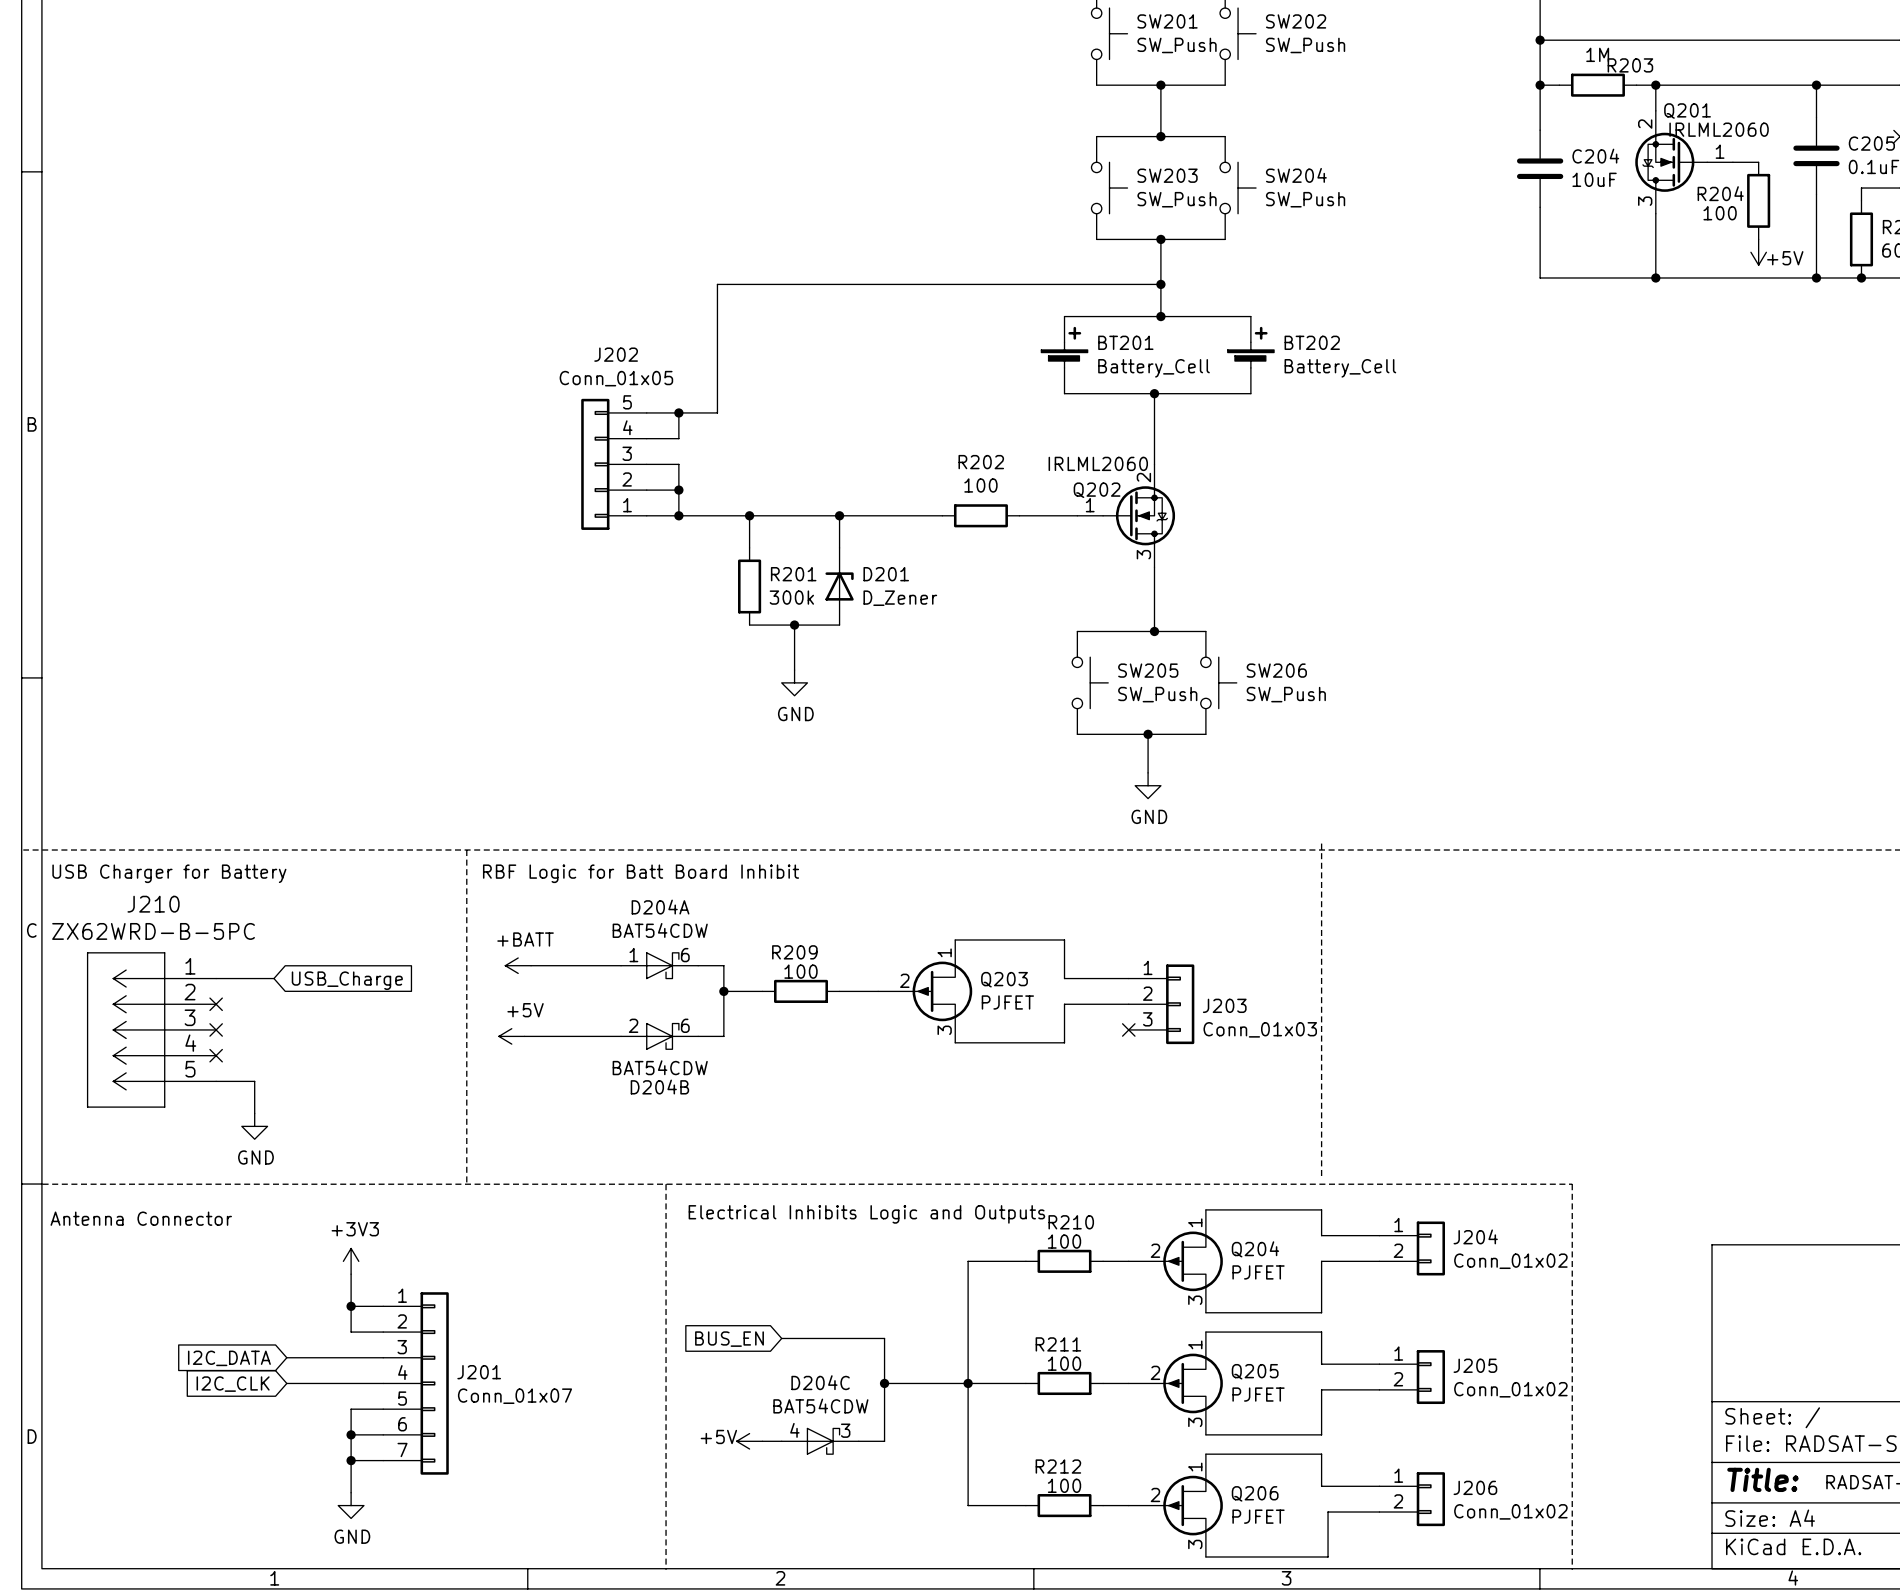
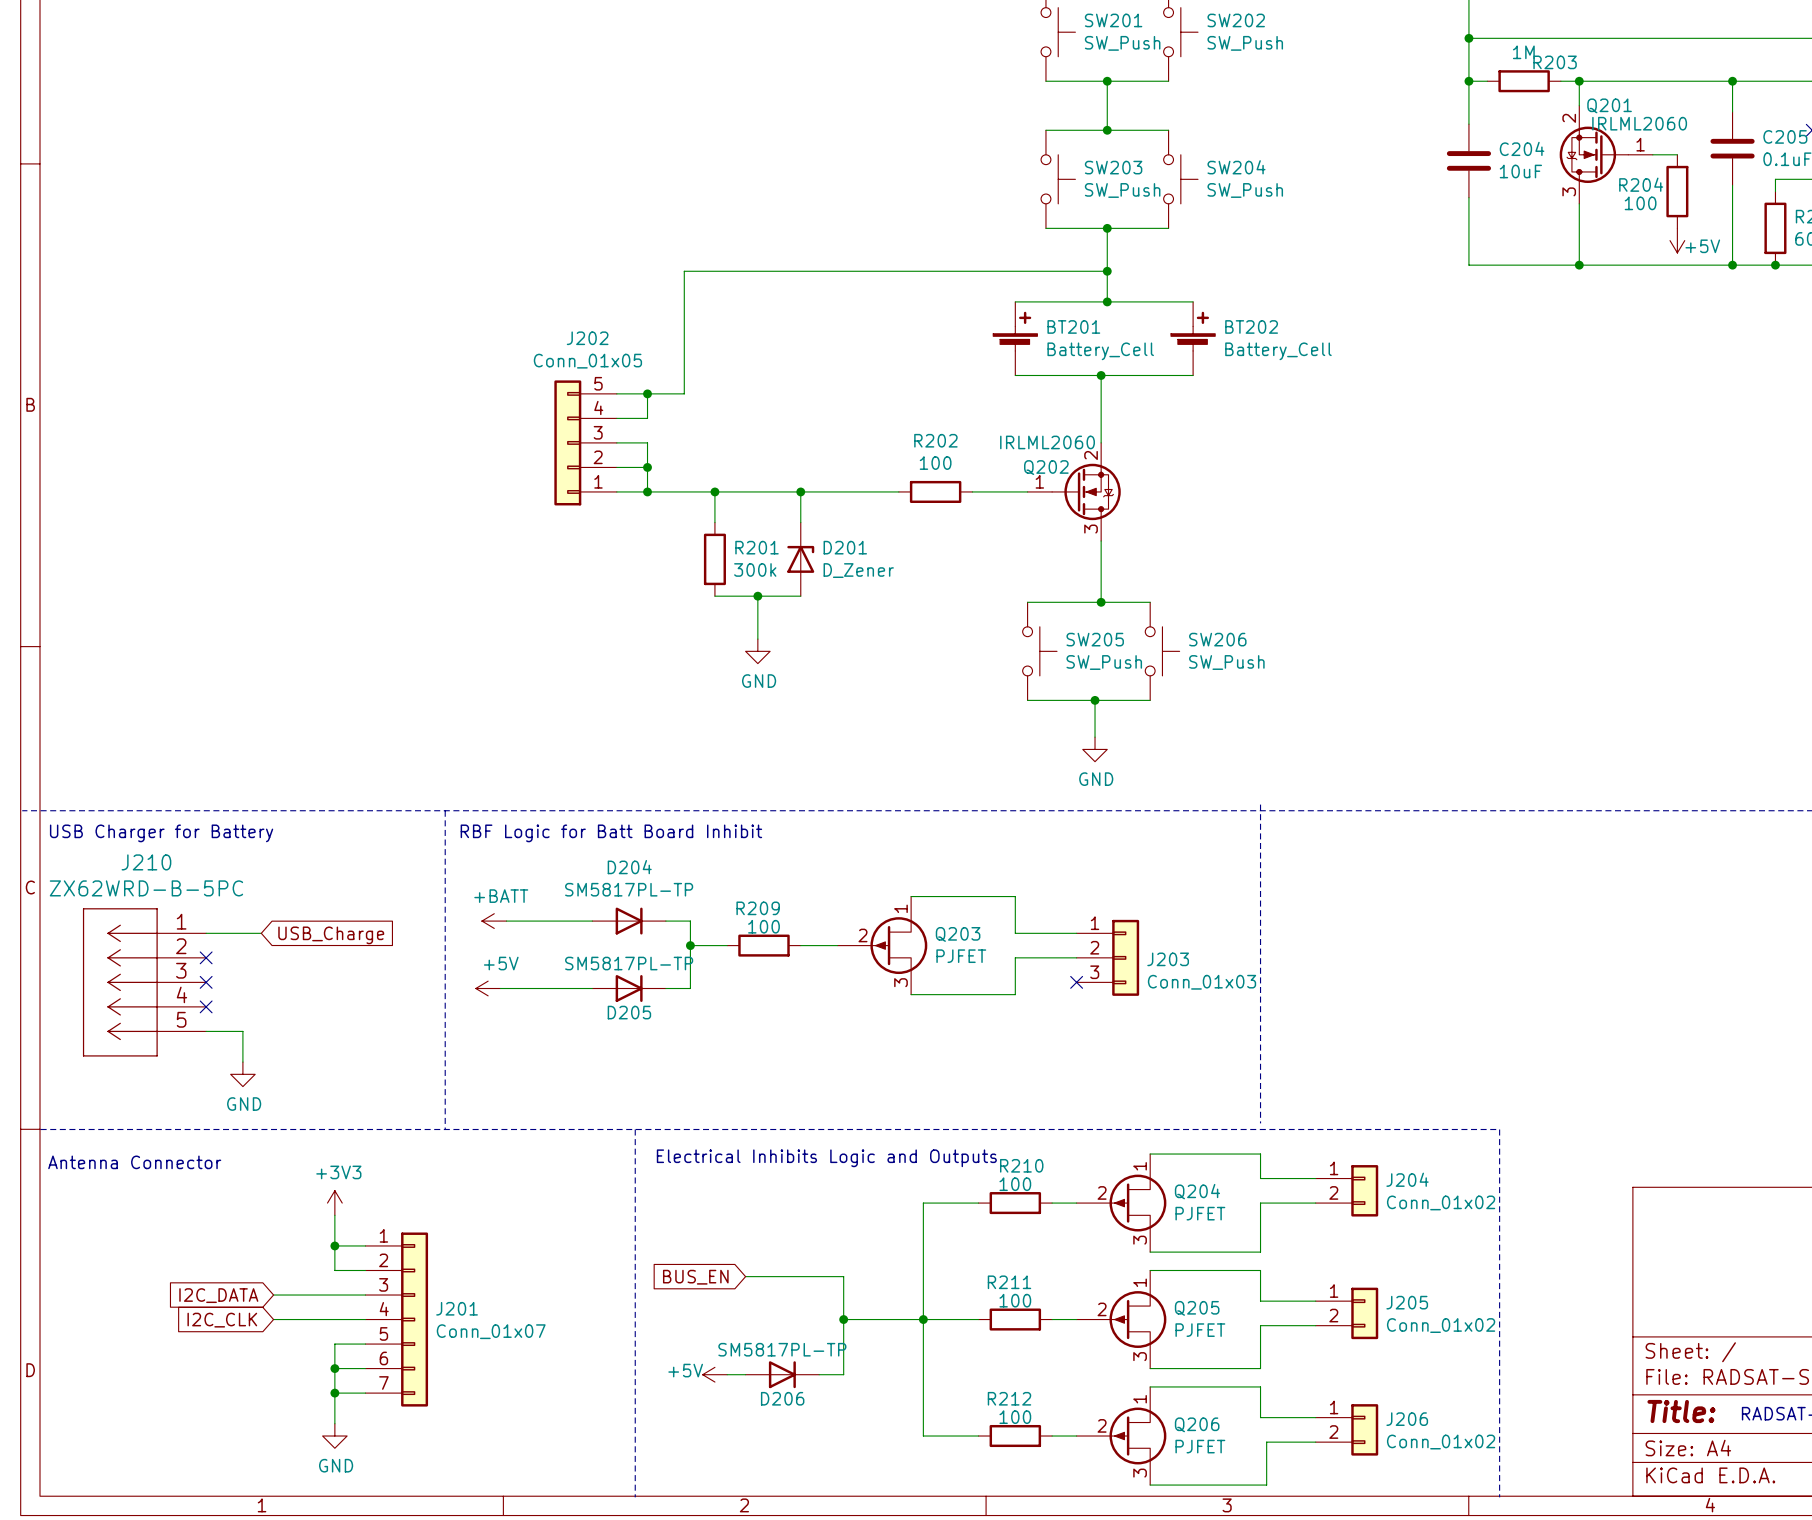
D204A: BAT54CDW (659, 965) -> none
D204: none -> SM5817PL-TP (629, 921)
D204B: BAT54CDW (659, 1036) -> none
D205: none -> SM5817PL-TP (629, 988)
D204C: BAT54CDW (820, 1441) -> none
D206: none -> SM5817PL-TP (782, 1374)

